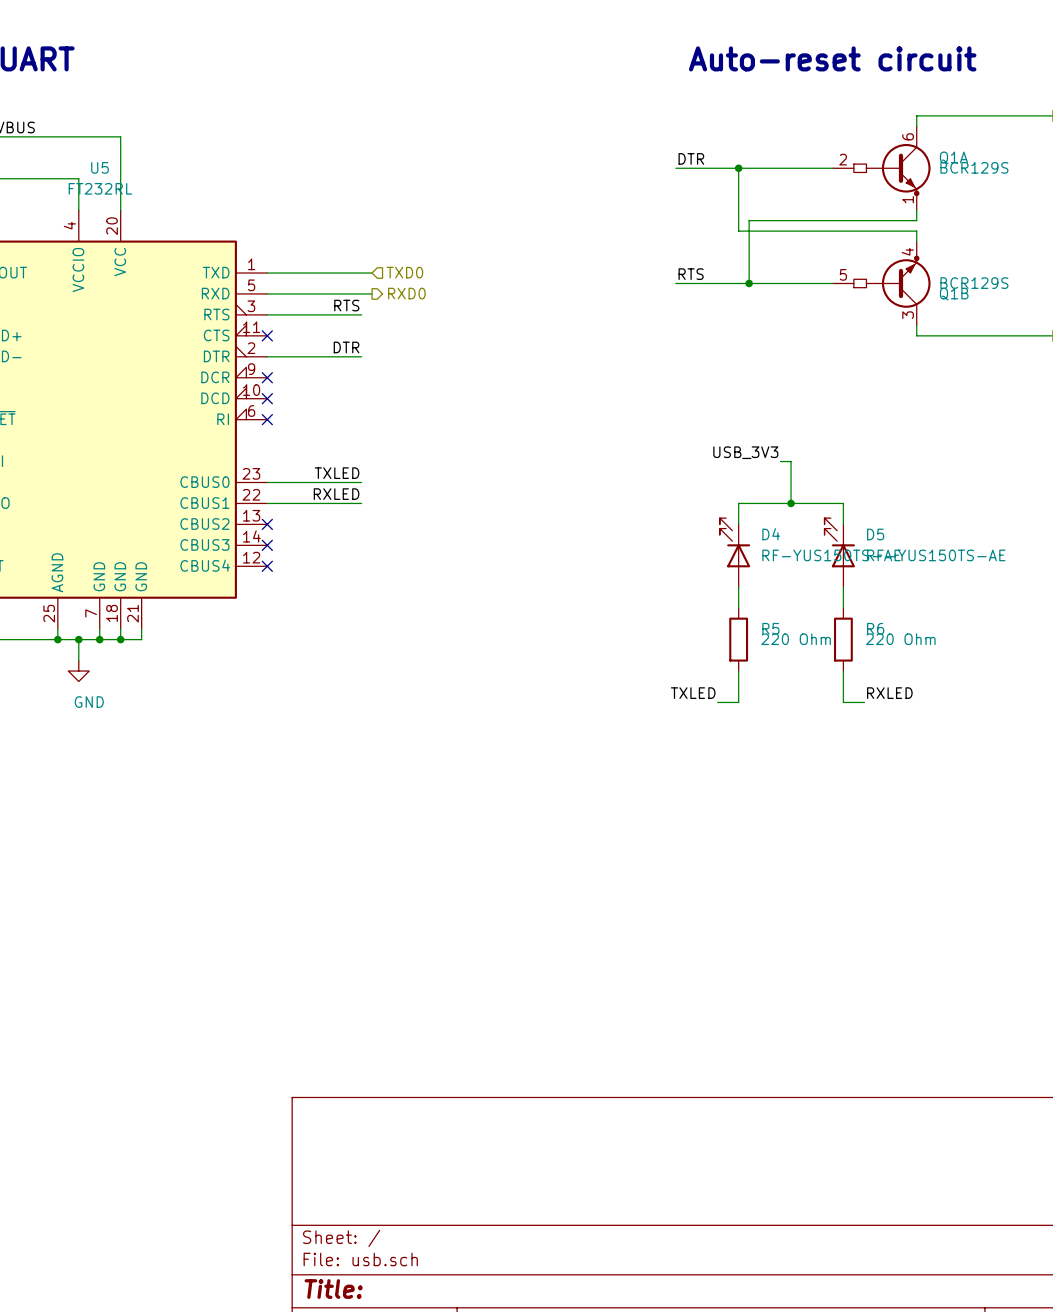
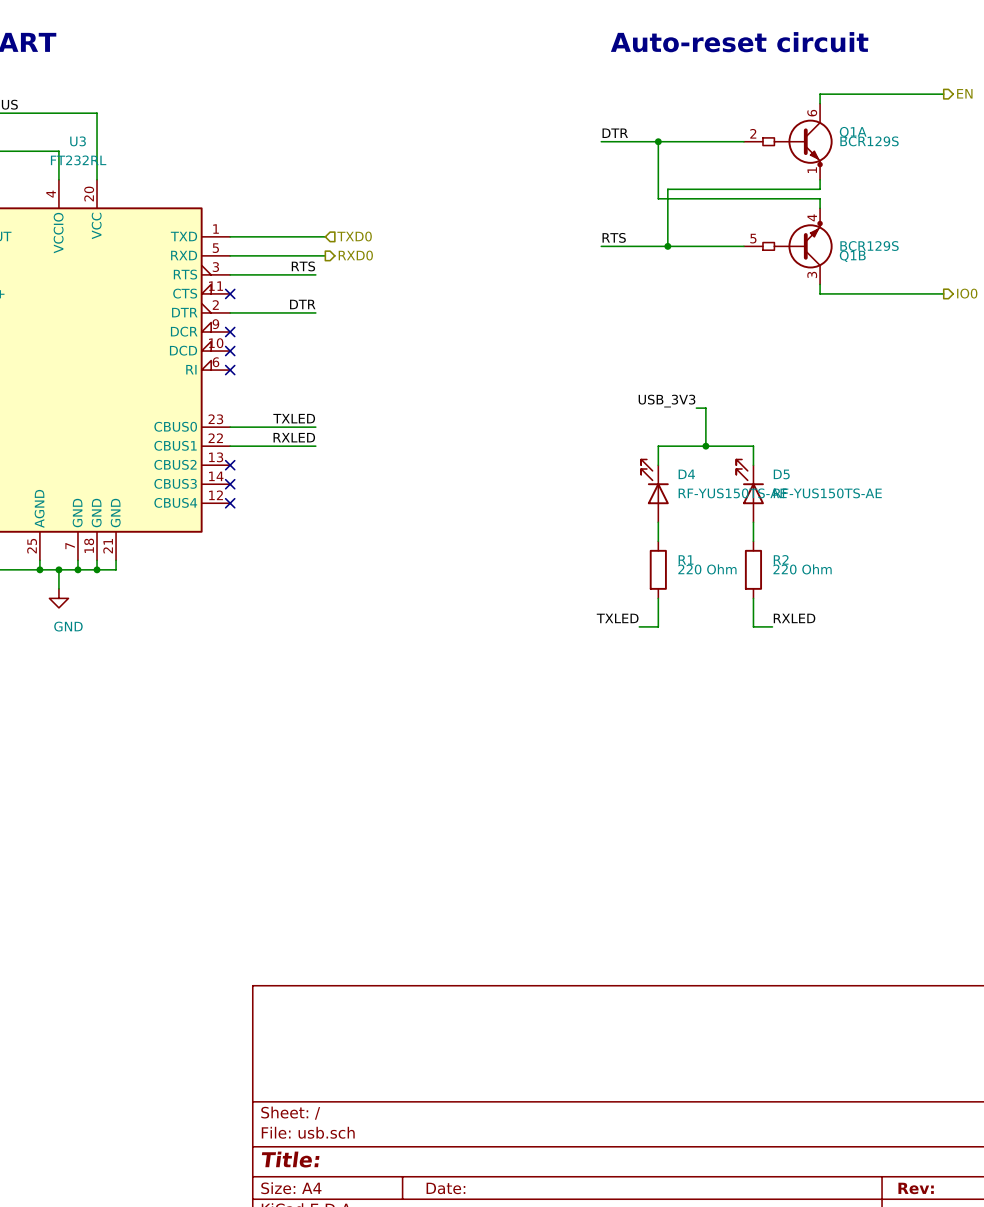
U5 name: U5 (99, 167) -> U3 (78, 141)
R5 name: R5 (770, 628) -> R1 (686, 559)
R6 name: R6 (875, 628) -> R2 (781, 559)

